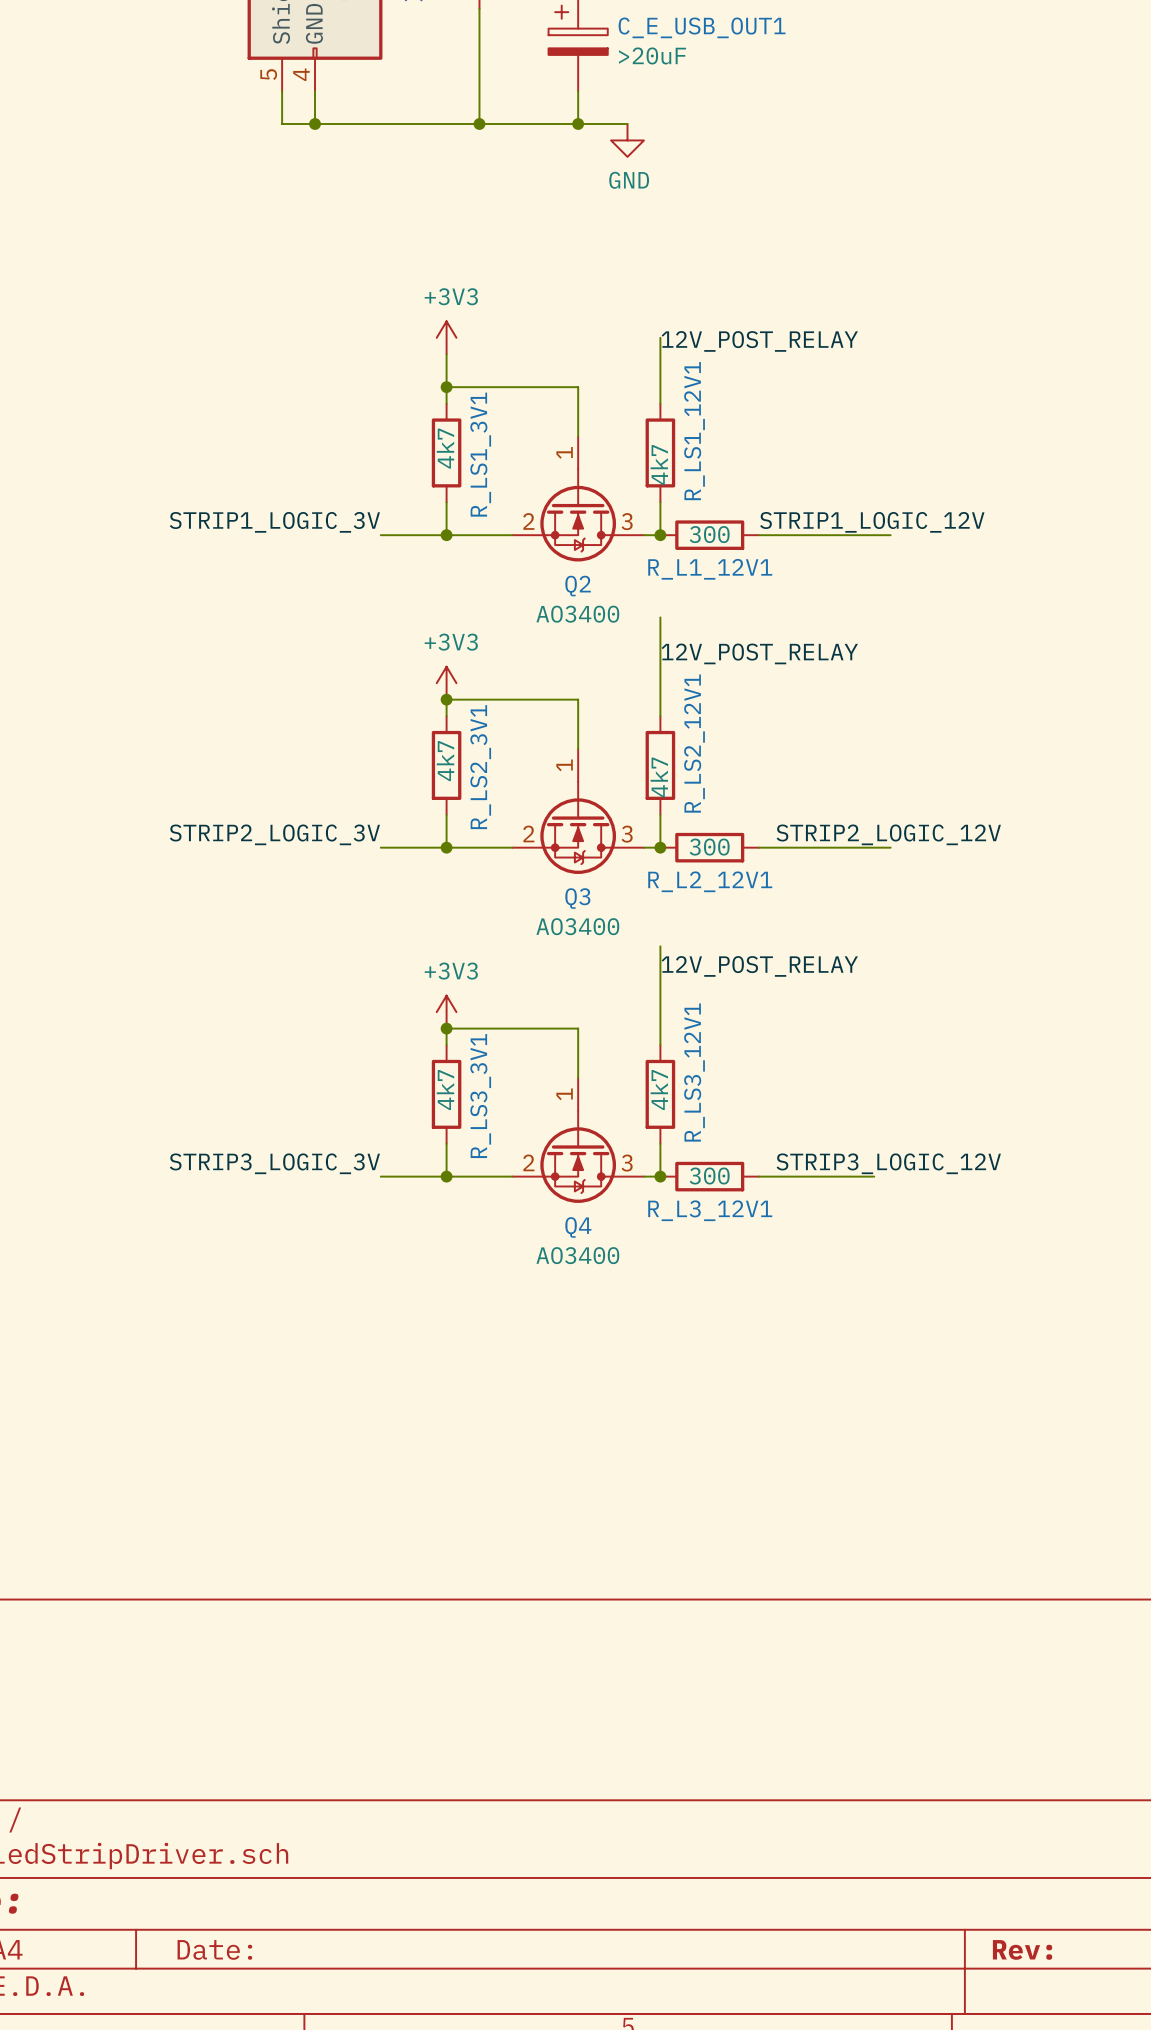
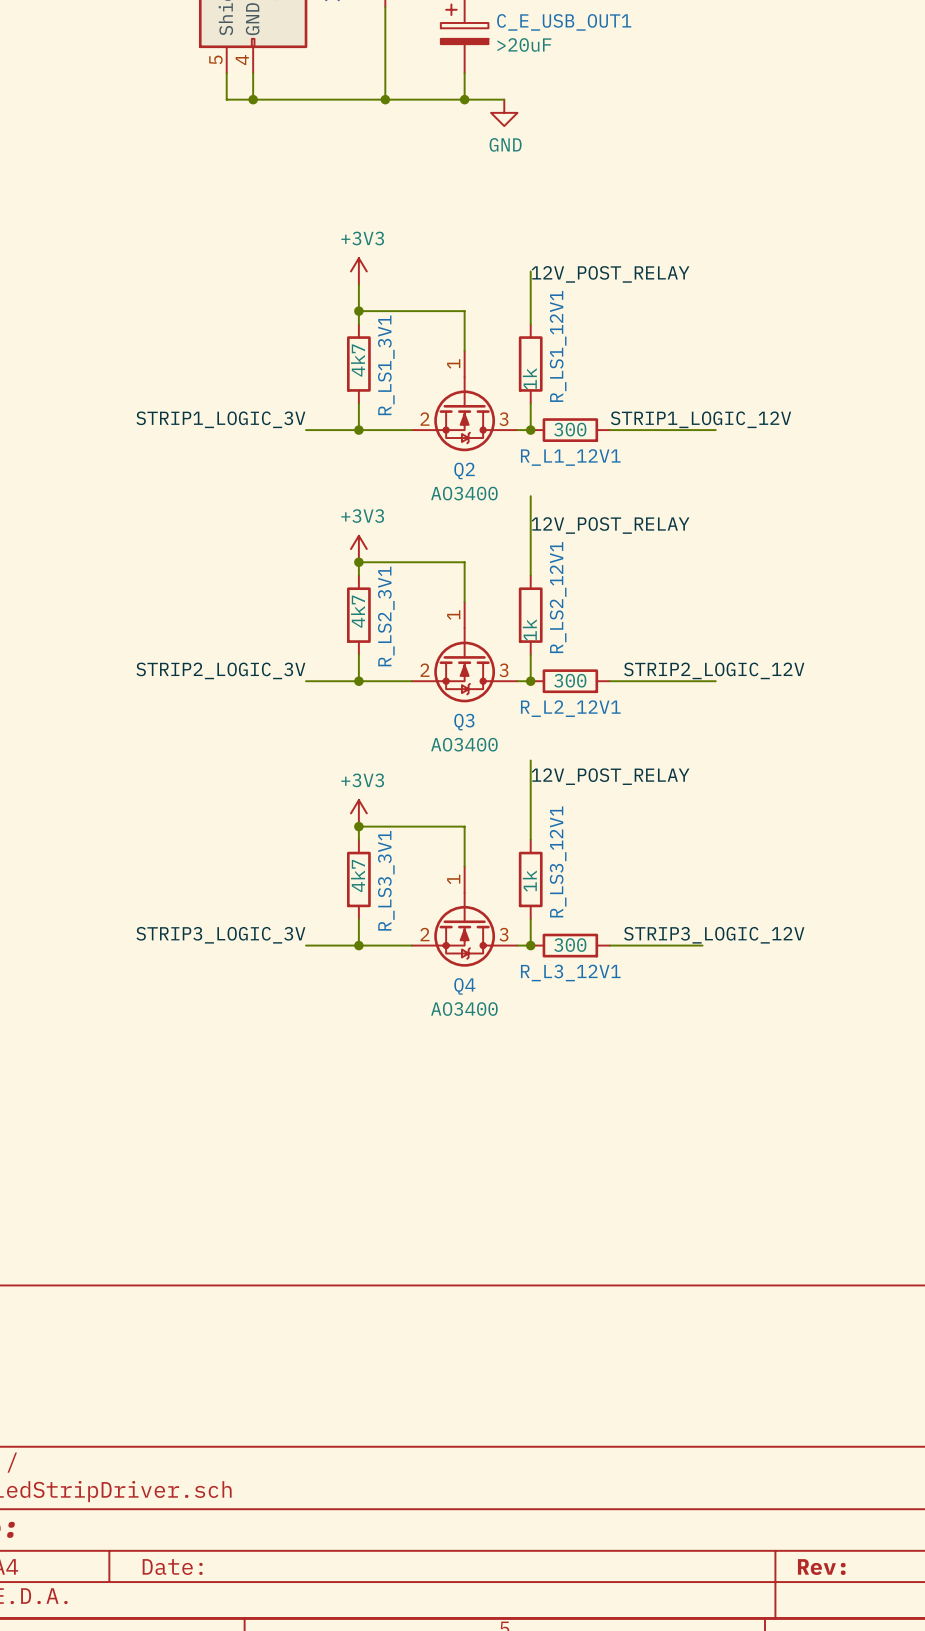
R_LS1_12V1 value: 4k7 (659, 465) -> 1k (529, 378)
R_LS2_12V1 value: 4k7 (659, 777) -> 1k (529, 629)
R_LS3_12V1 value: 4k7 (659, 1090) -> 1k (529, 881)

